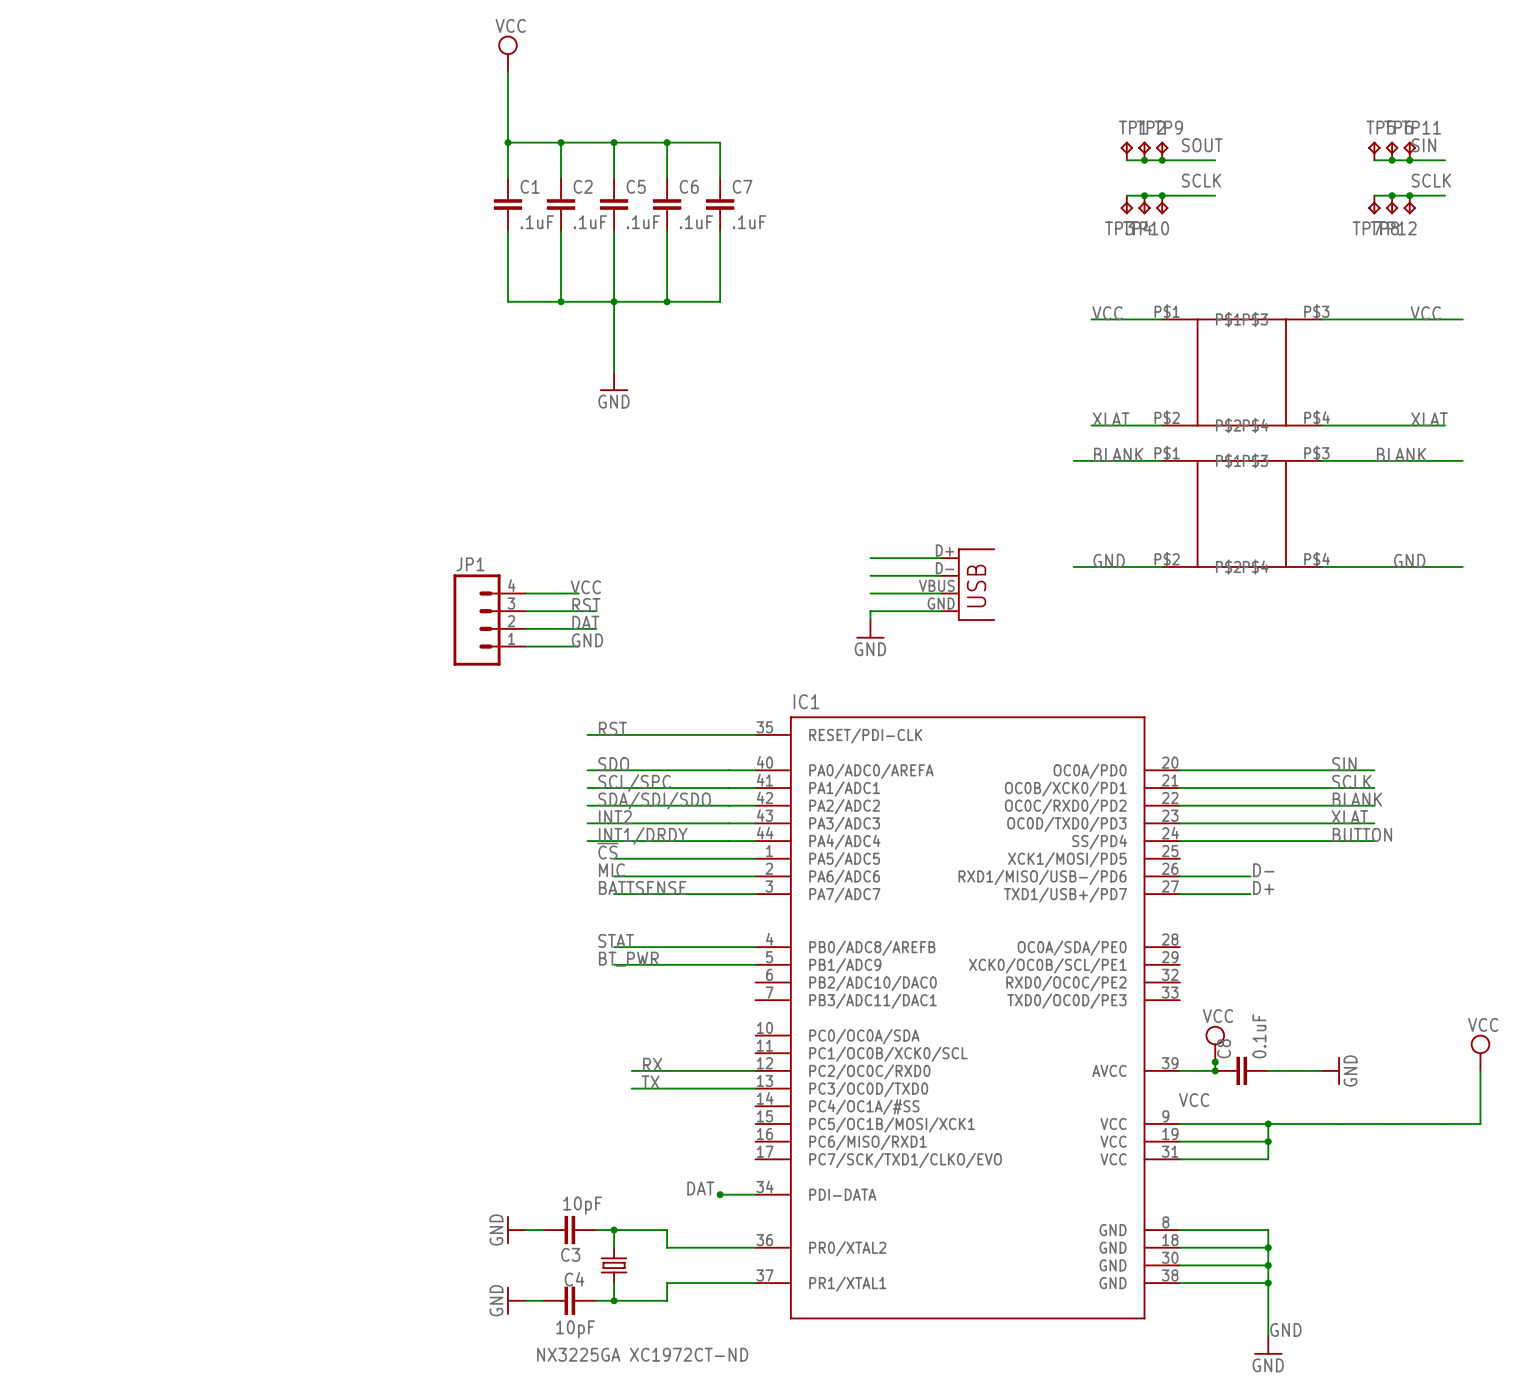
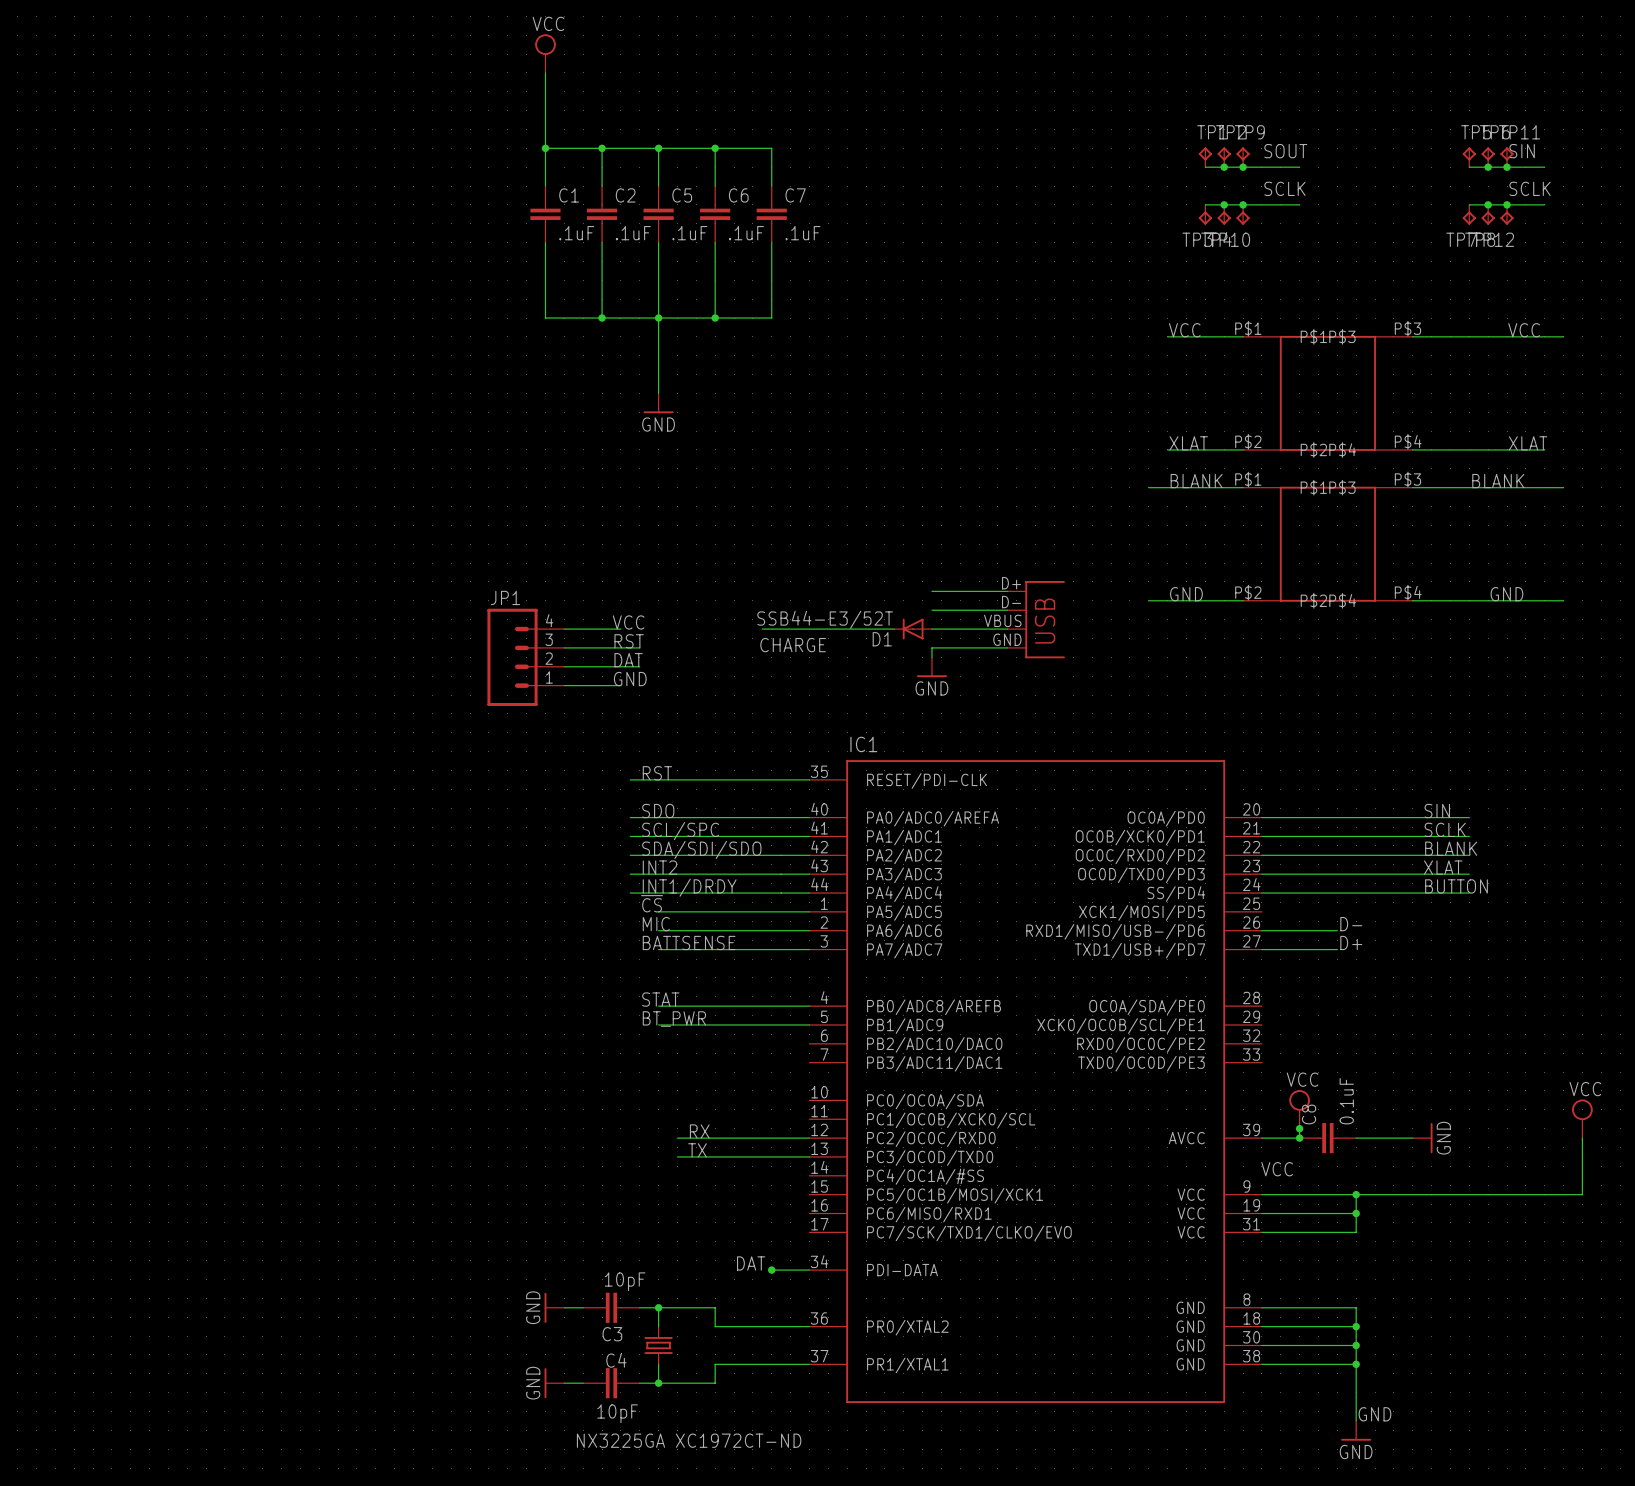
wire: none -> (762, 629) (894, 629)
D1: none -> SSB44-E3/52T (913, 629)
label: none -> CHARGE (793, 645)

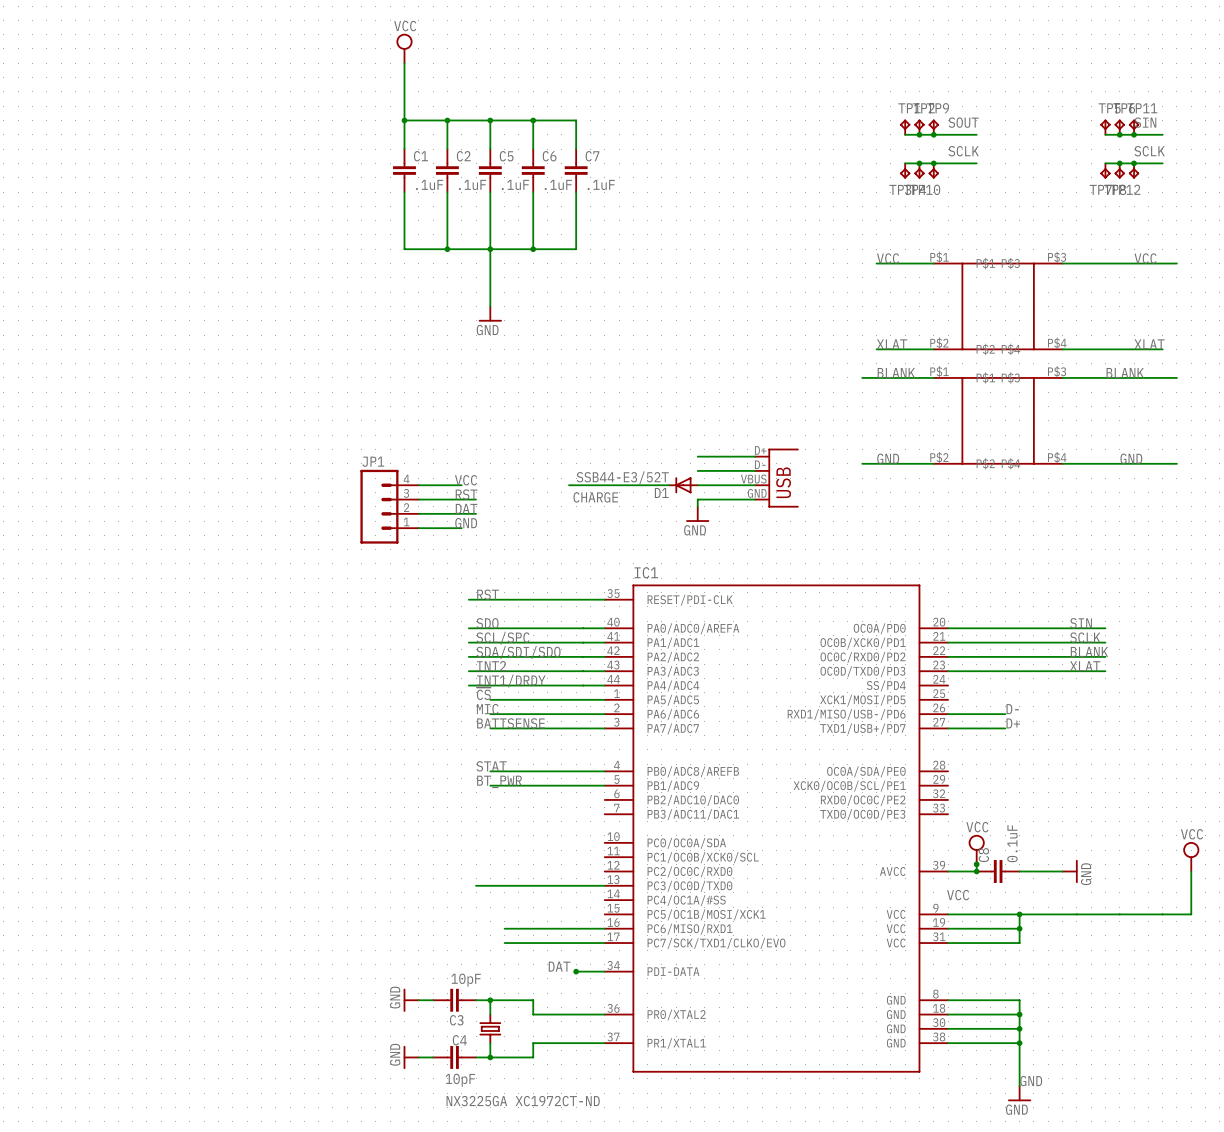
label: BUTTON (1456, 886) -> none
wire: (1261, 893) (1469, 893) -> none
label: RX (699, 1131) -> none
wire: (677, 1138) (809, 1138) -> (504, 928) (604, 928)
label: TX (697, 1150) -> none
wire: none -> (476, 885) (504, 885)
wire: none -> (504, 943) (604, 943)

